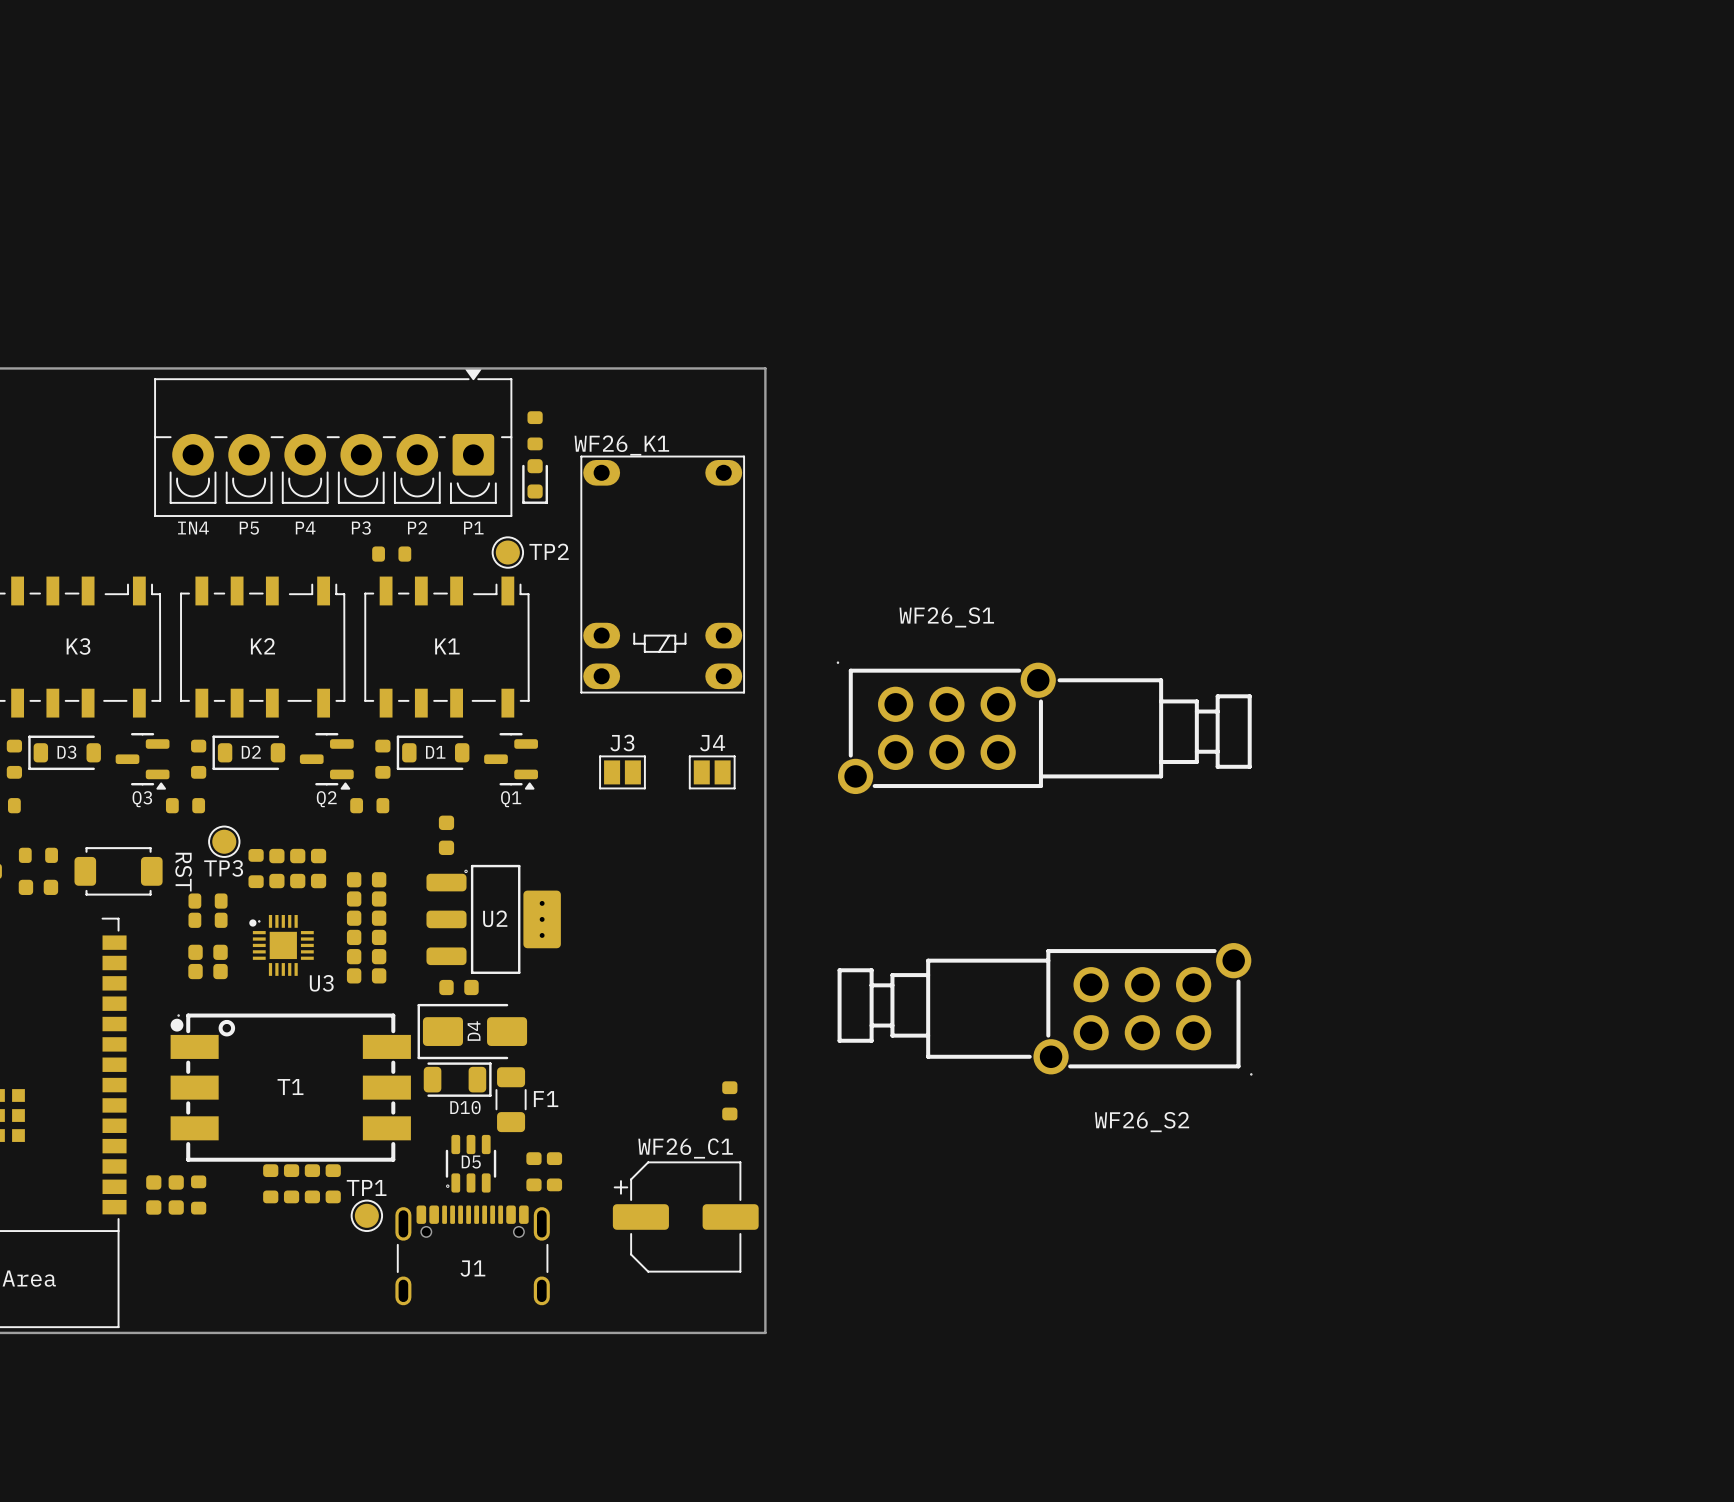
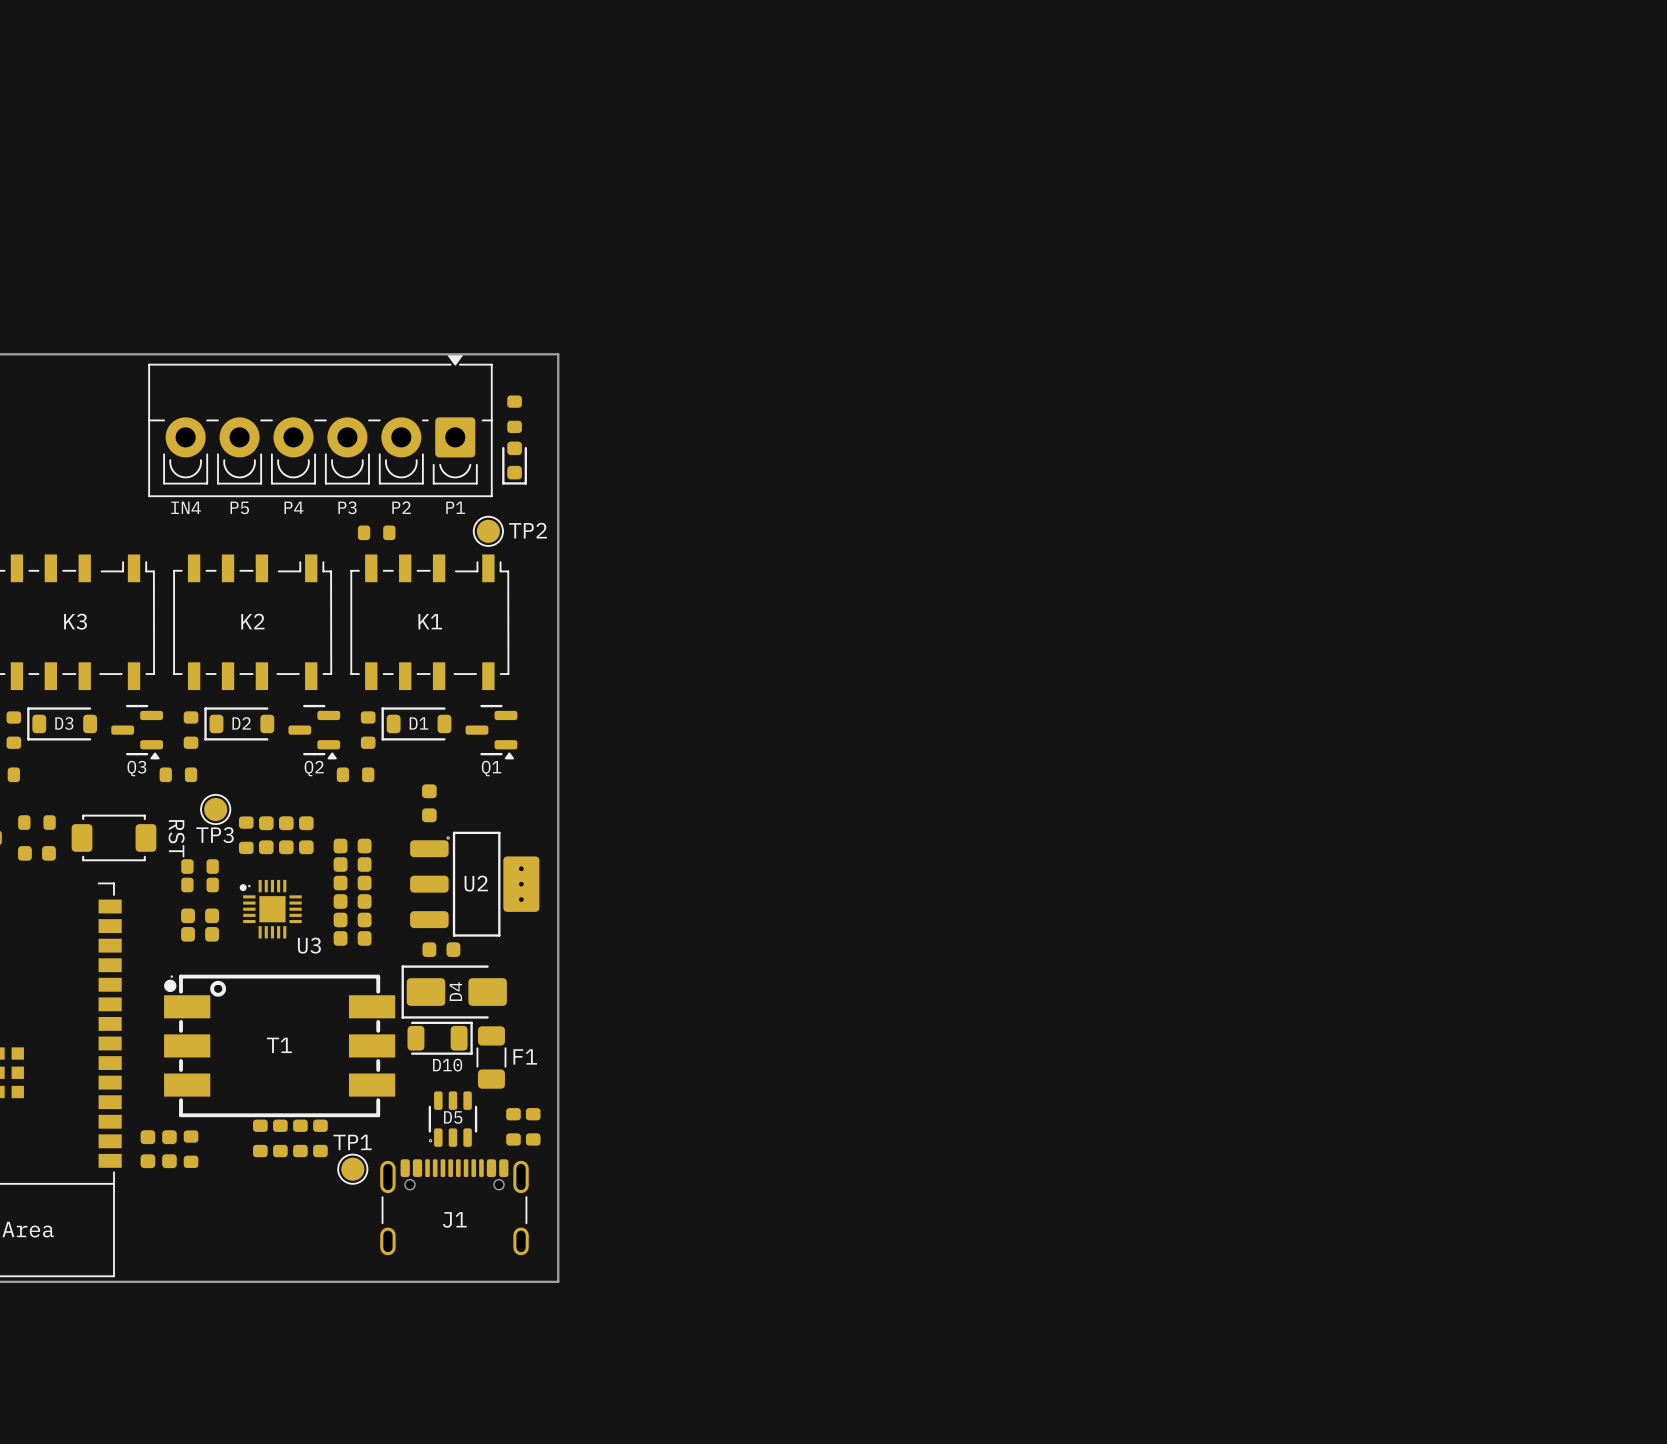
board edge: (580, 368) (765, 368) (765, 1332) (580, 1332) -> (558, 354) (558, 1281)
WF26_K1: (662, 574) -> none
WF26_S1: (1044, 727) -> none
J3: (622, 772) -> none
J4: (712, 772) -> none
WF26_S2: (1044, 1009) -> none
part: (729, 1100) -> none
WF26_C1: (685, 1217) -> none

